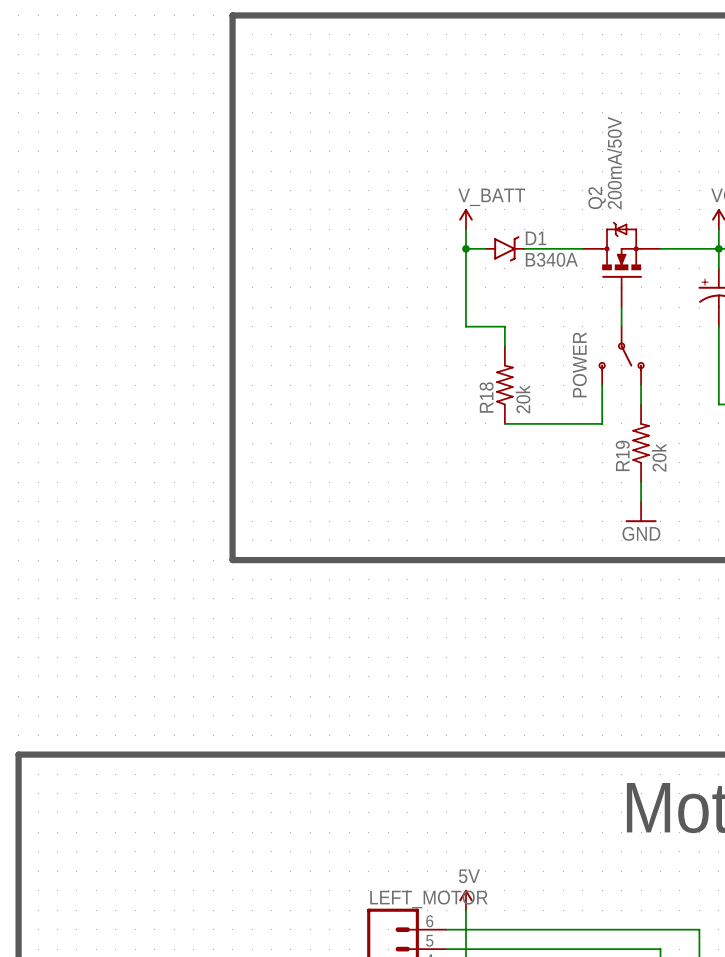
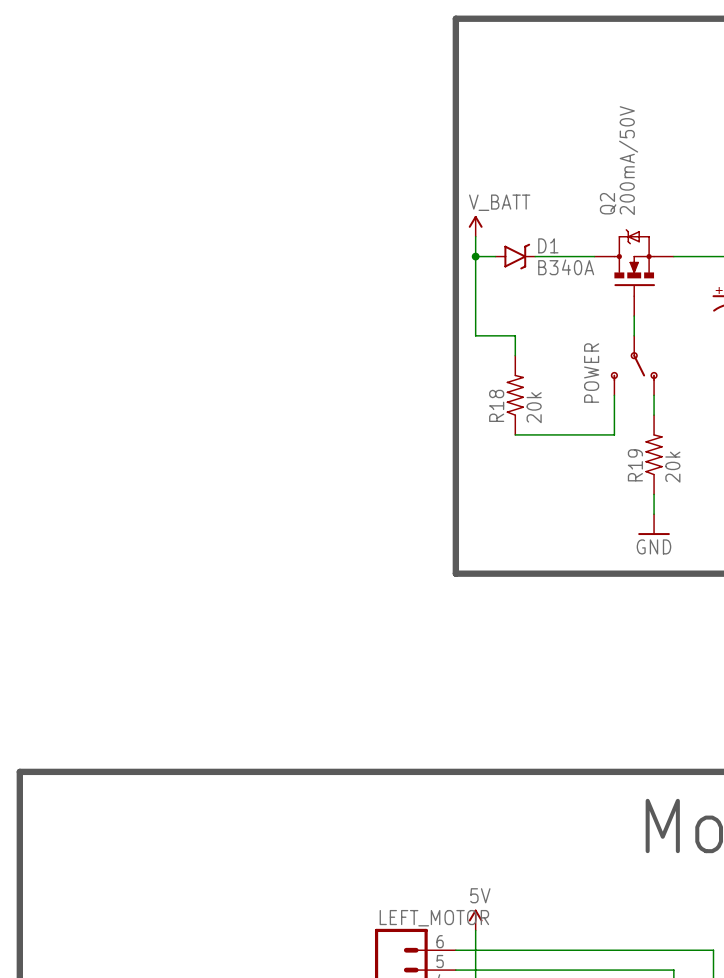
line: (446, 15) (232, 15) (232, 560) (446, 560) -> (455, 18) (455, 573)

